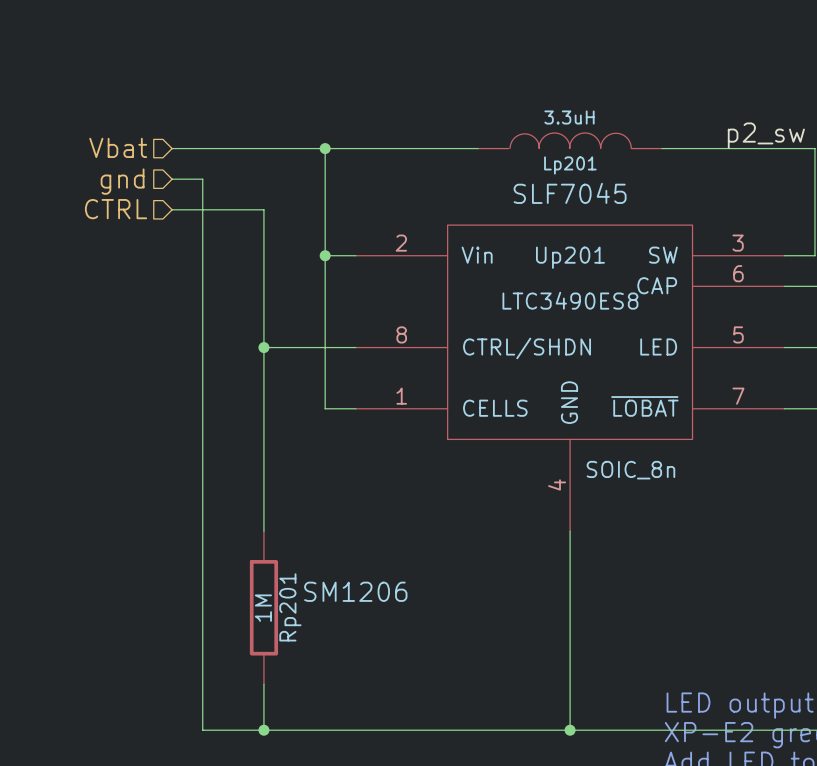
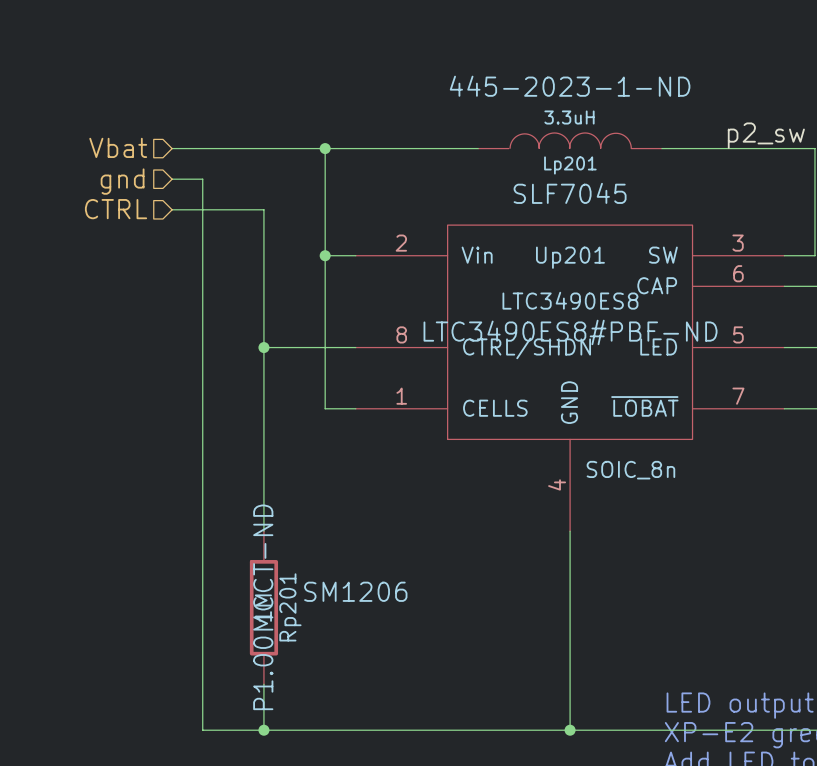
Lp201 text: none -> 445-2023-1-ND (570, 86)
Up201 text: none -> LTC3490ES8#PBF-ND (570, 332)
Rp201 text: none -> P1.00MCCT-ND (263, 607)

